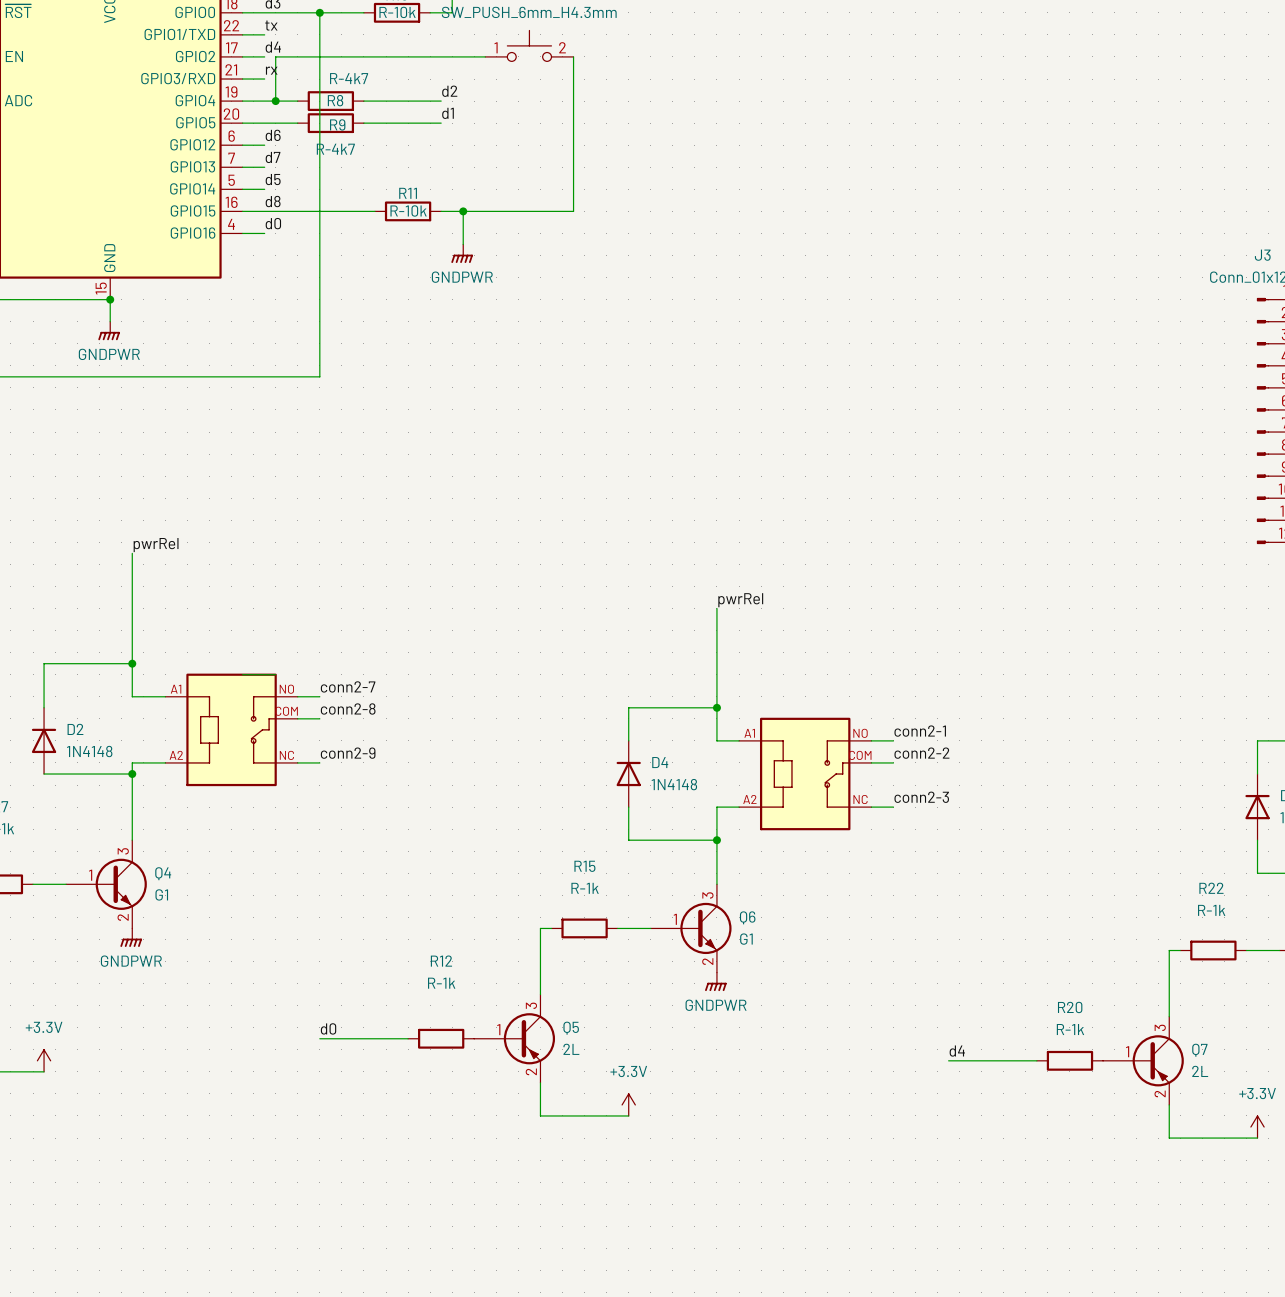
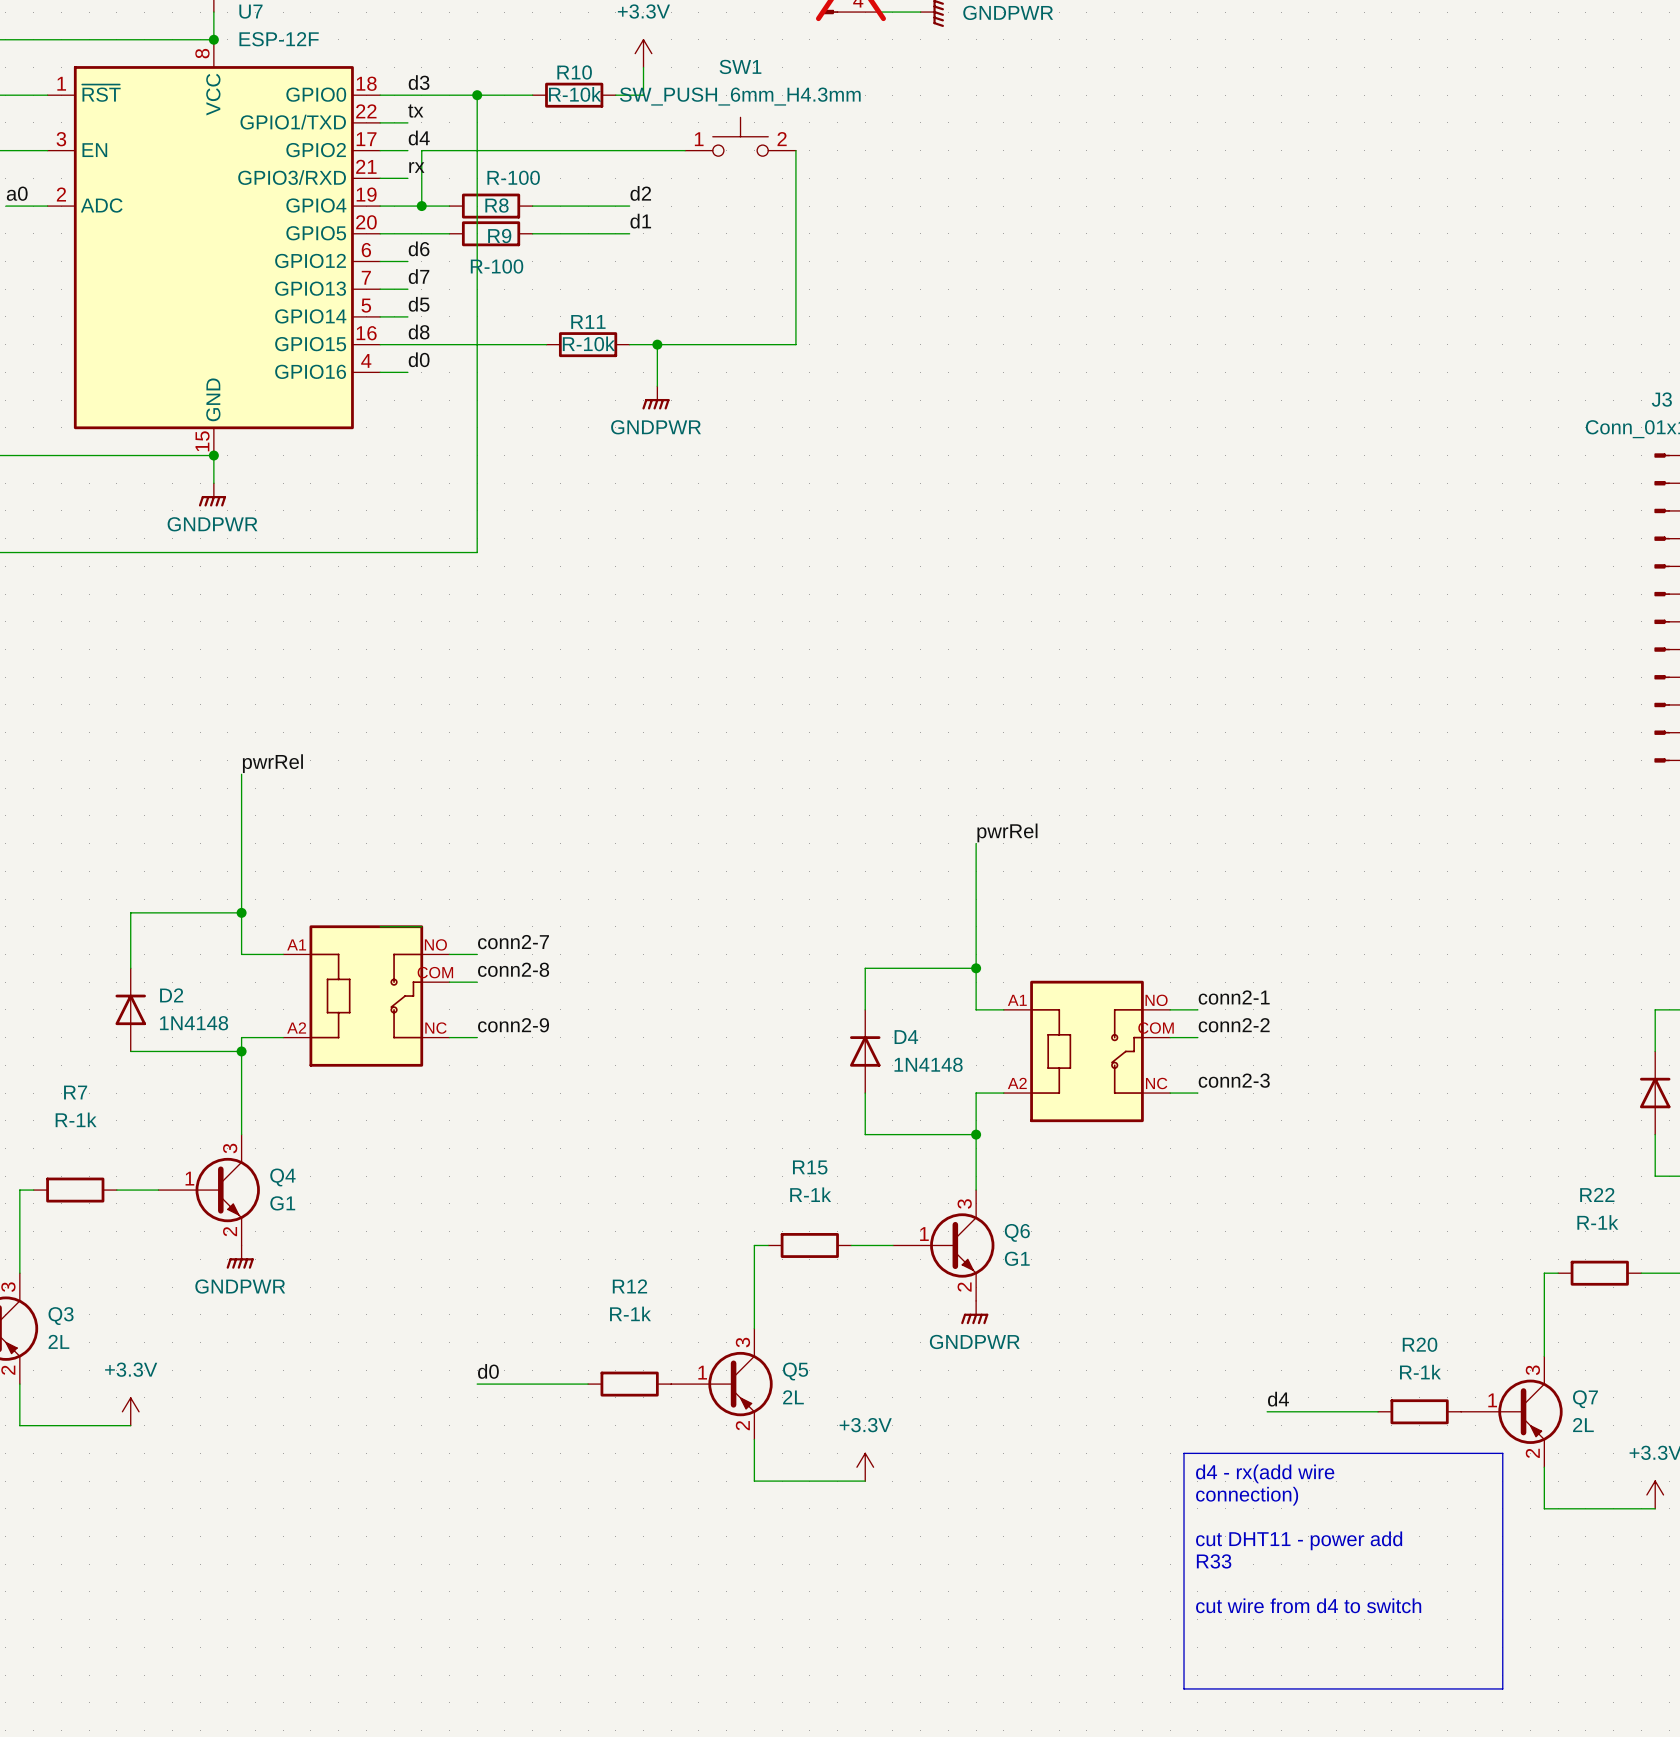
R8 value: R-4k7 (349, 78) -> R-100 (513, 177)
R9 value: R-4k7 (335, 149) -> R-100 (497, 266)
line: none -> (1184, 1453) (1502, 1453) (1502, 1688) (1184, 1688) (1184, 1453)
text: none -> d4 - rx(add wire (1265, 1473)
text: none -> connection) (1247, 1496)
text: none -> cut DHT11 - power add (1299, 1540)
text: none -> R33 (1214, 1561)
text: none -> cut wire from d4 to switch (1308, 1605)

